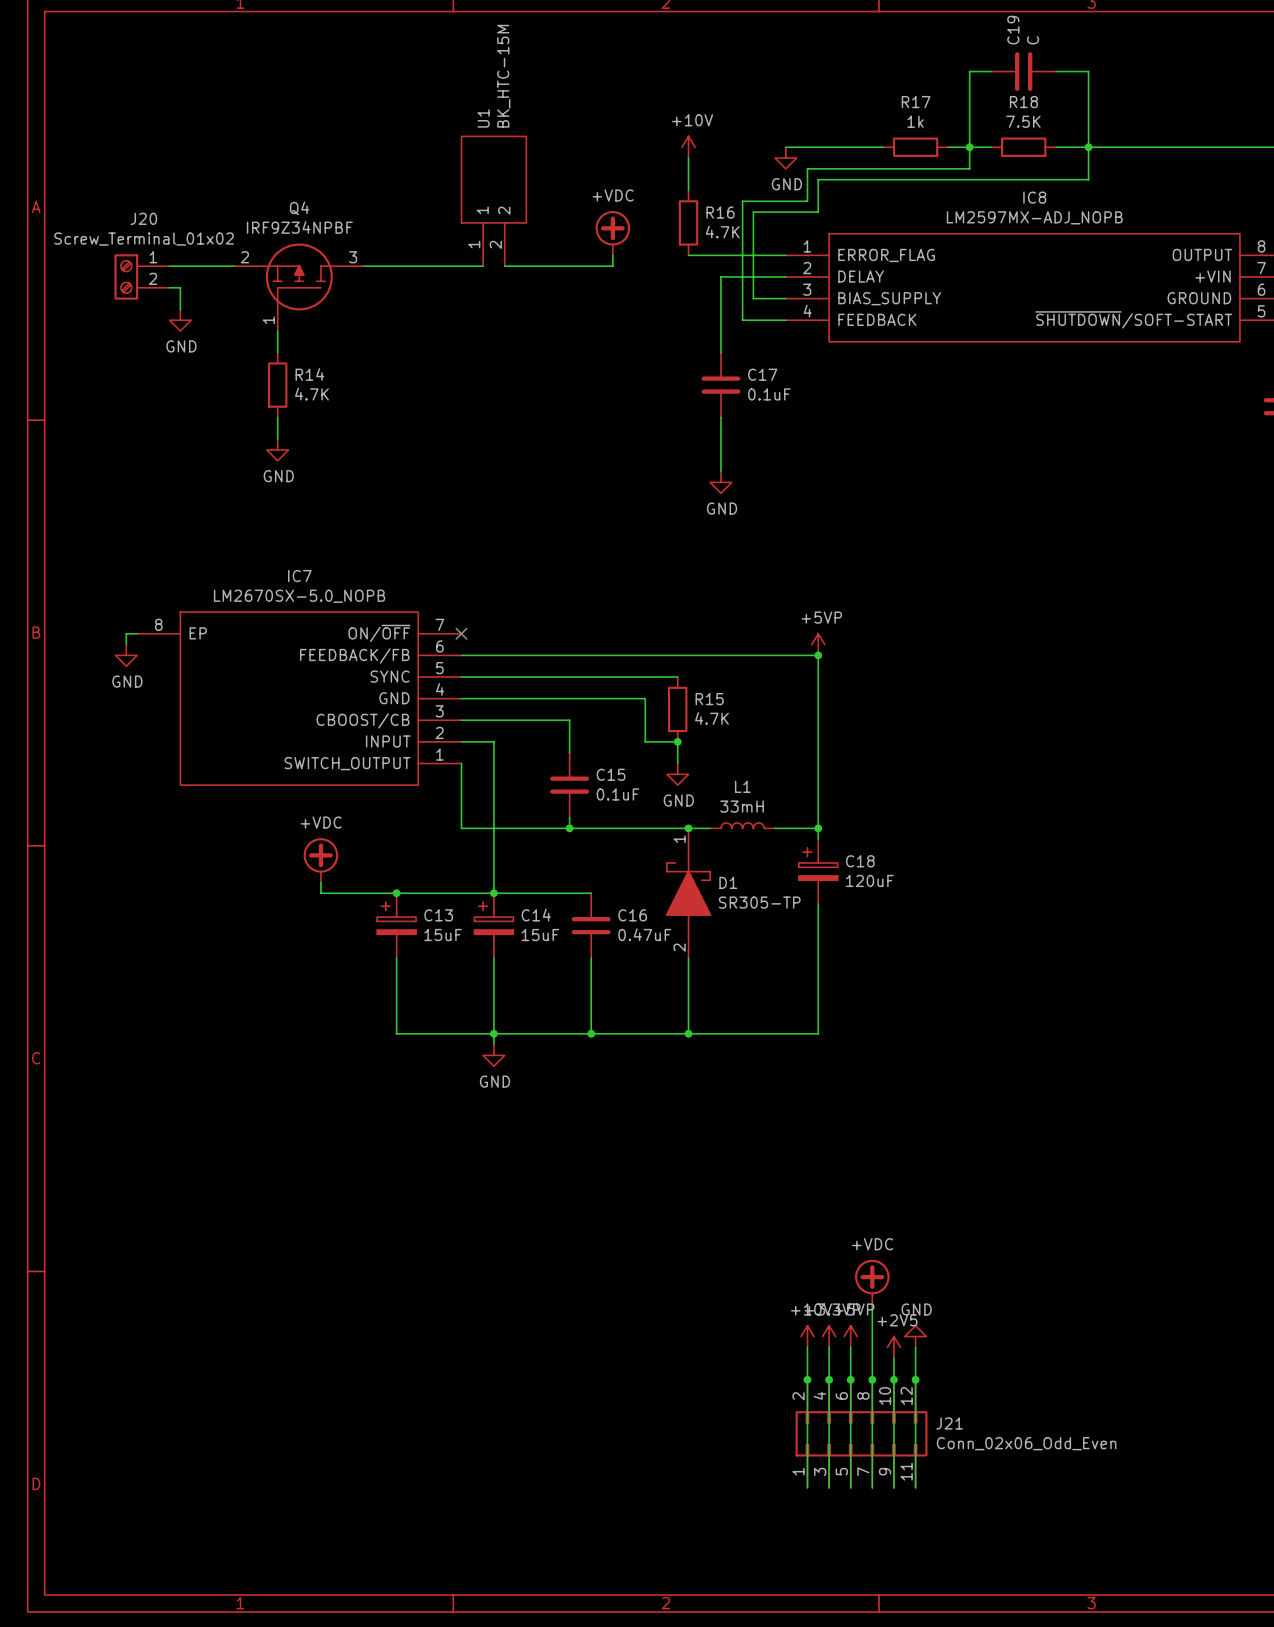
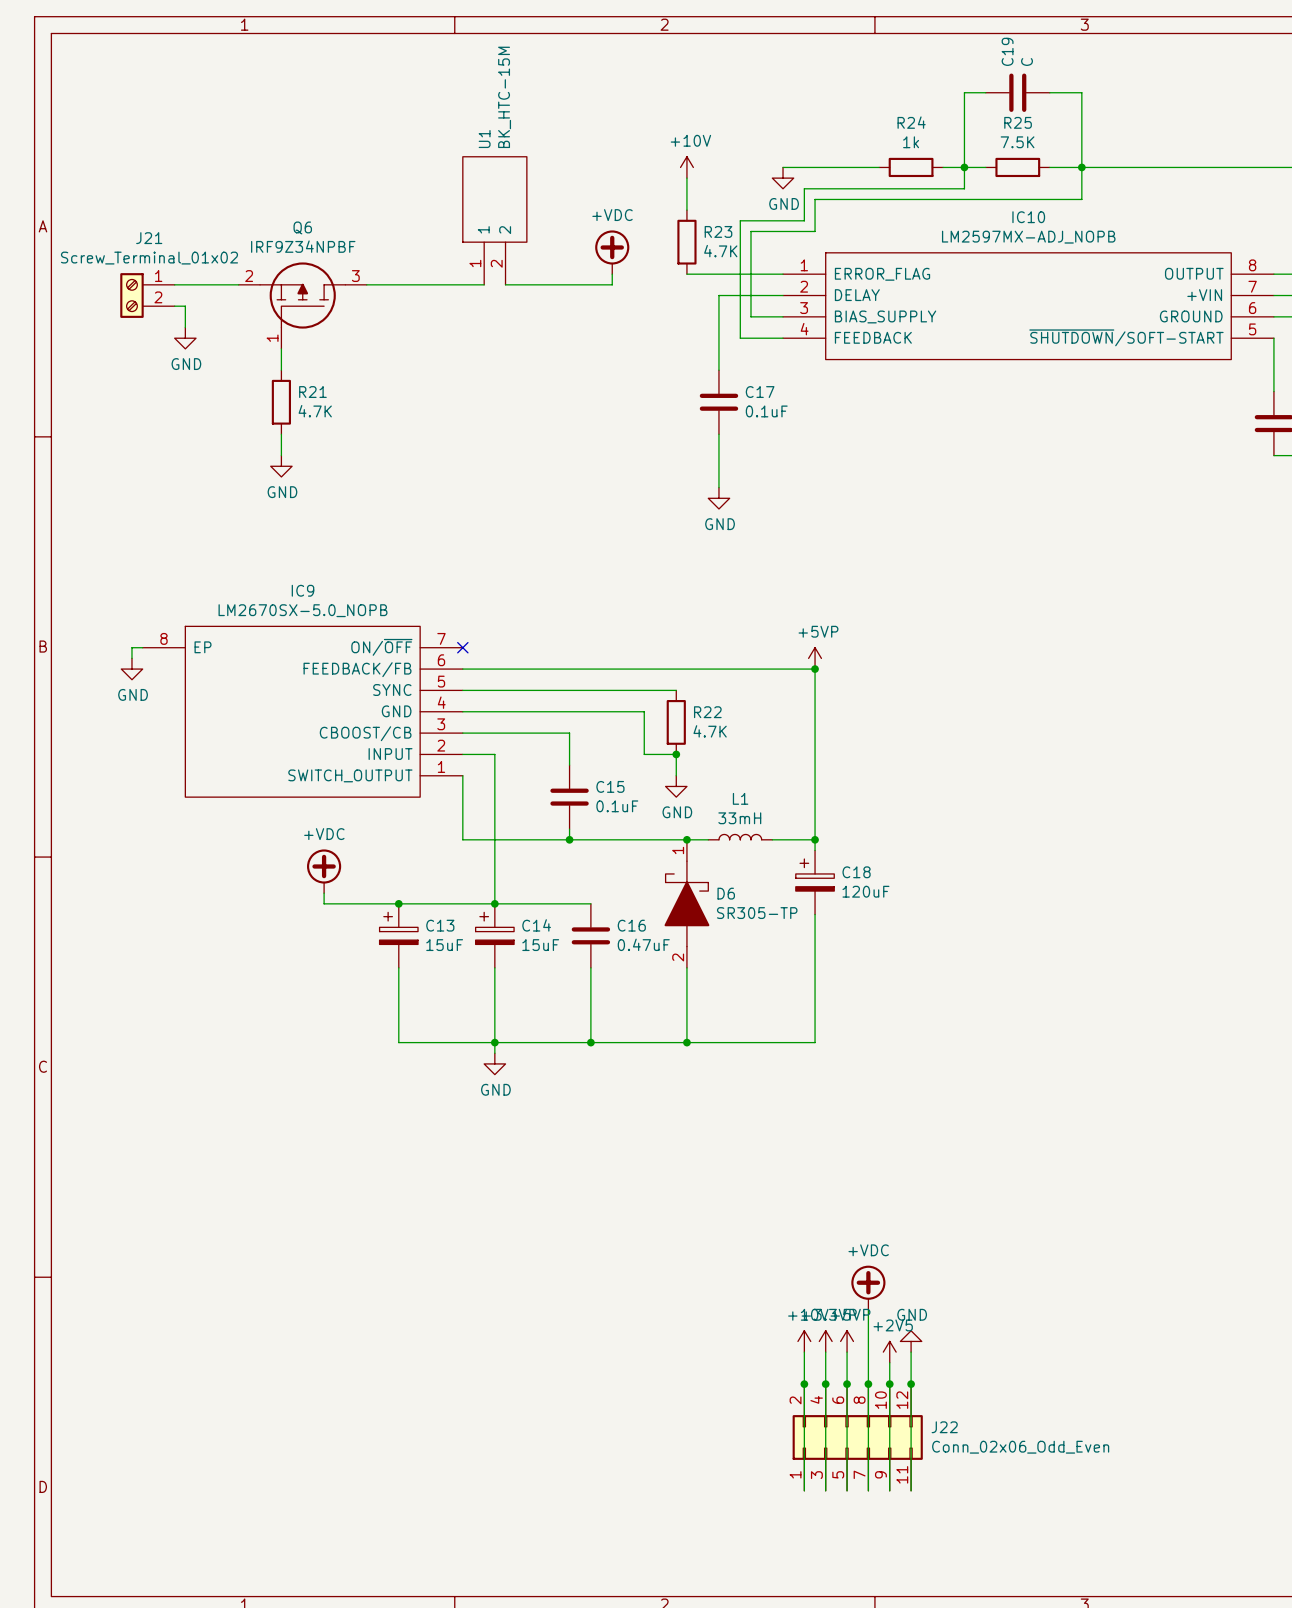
R17 name: R17 (916, 102) -> R24 (911, 122)
R18 name: R18 (1023, 102) -> R25 (1018, 122)
IC8 name: IC8 (1034, 197) -> IC10 (1028, 217)
Q4 name: Q4 (299, 208) -> Q6 (302, 227)
R16 name: R16 (720, 212) -> R23 (718, 231)
J20 name: J20 (143, 218) -> J21 (149, 238)
R14 name: R14 (309, 374) -> R21 (312, 392)
IC7 name: IC7 (299, 576) -> IC9 (302, 590)
R15 name: R15 (709, 699) -> R22 (707, 712)
D1 name: D1 (728, 882) -> D6 (726, 893)
J21 name: J21 (949, 1423) -> J22 (944, 1427)

